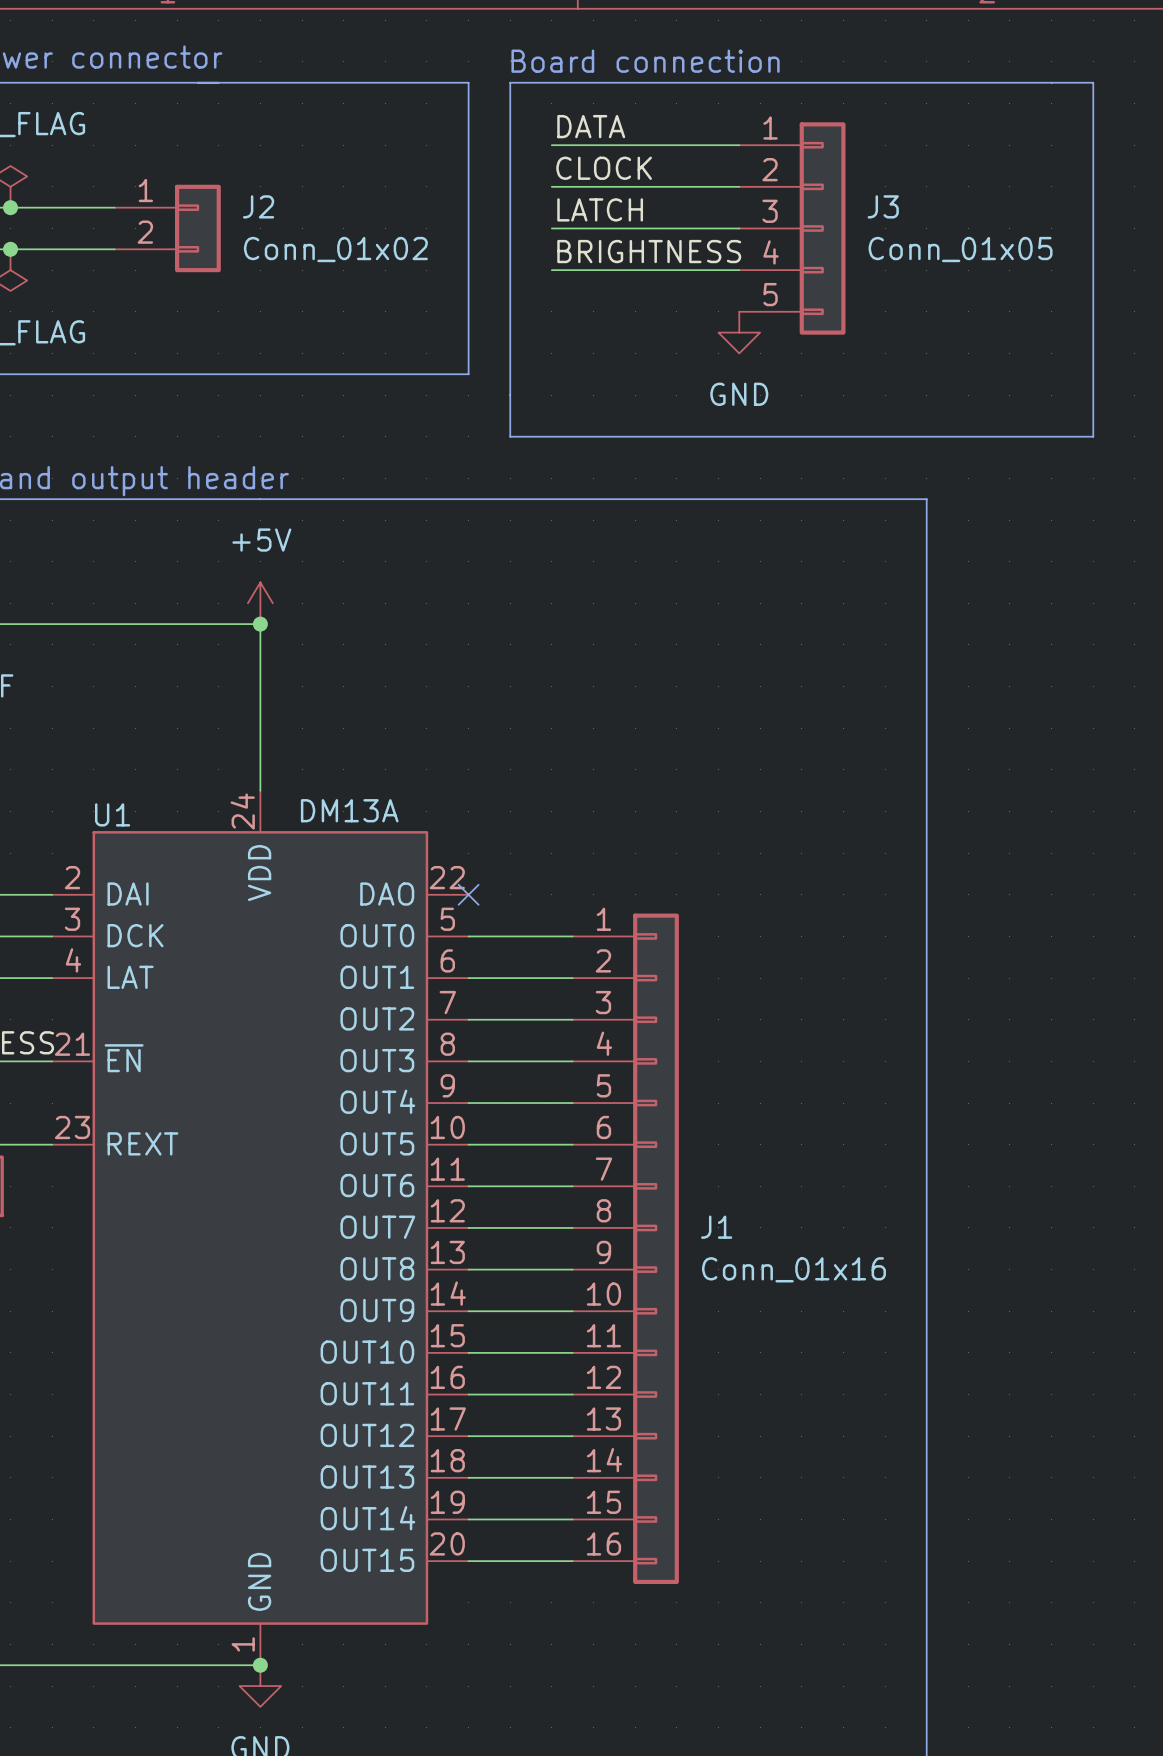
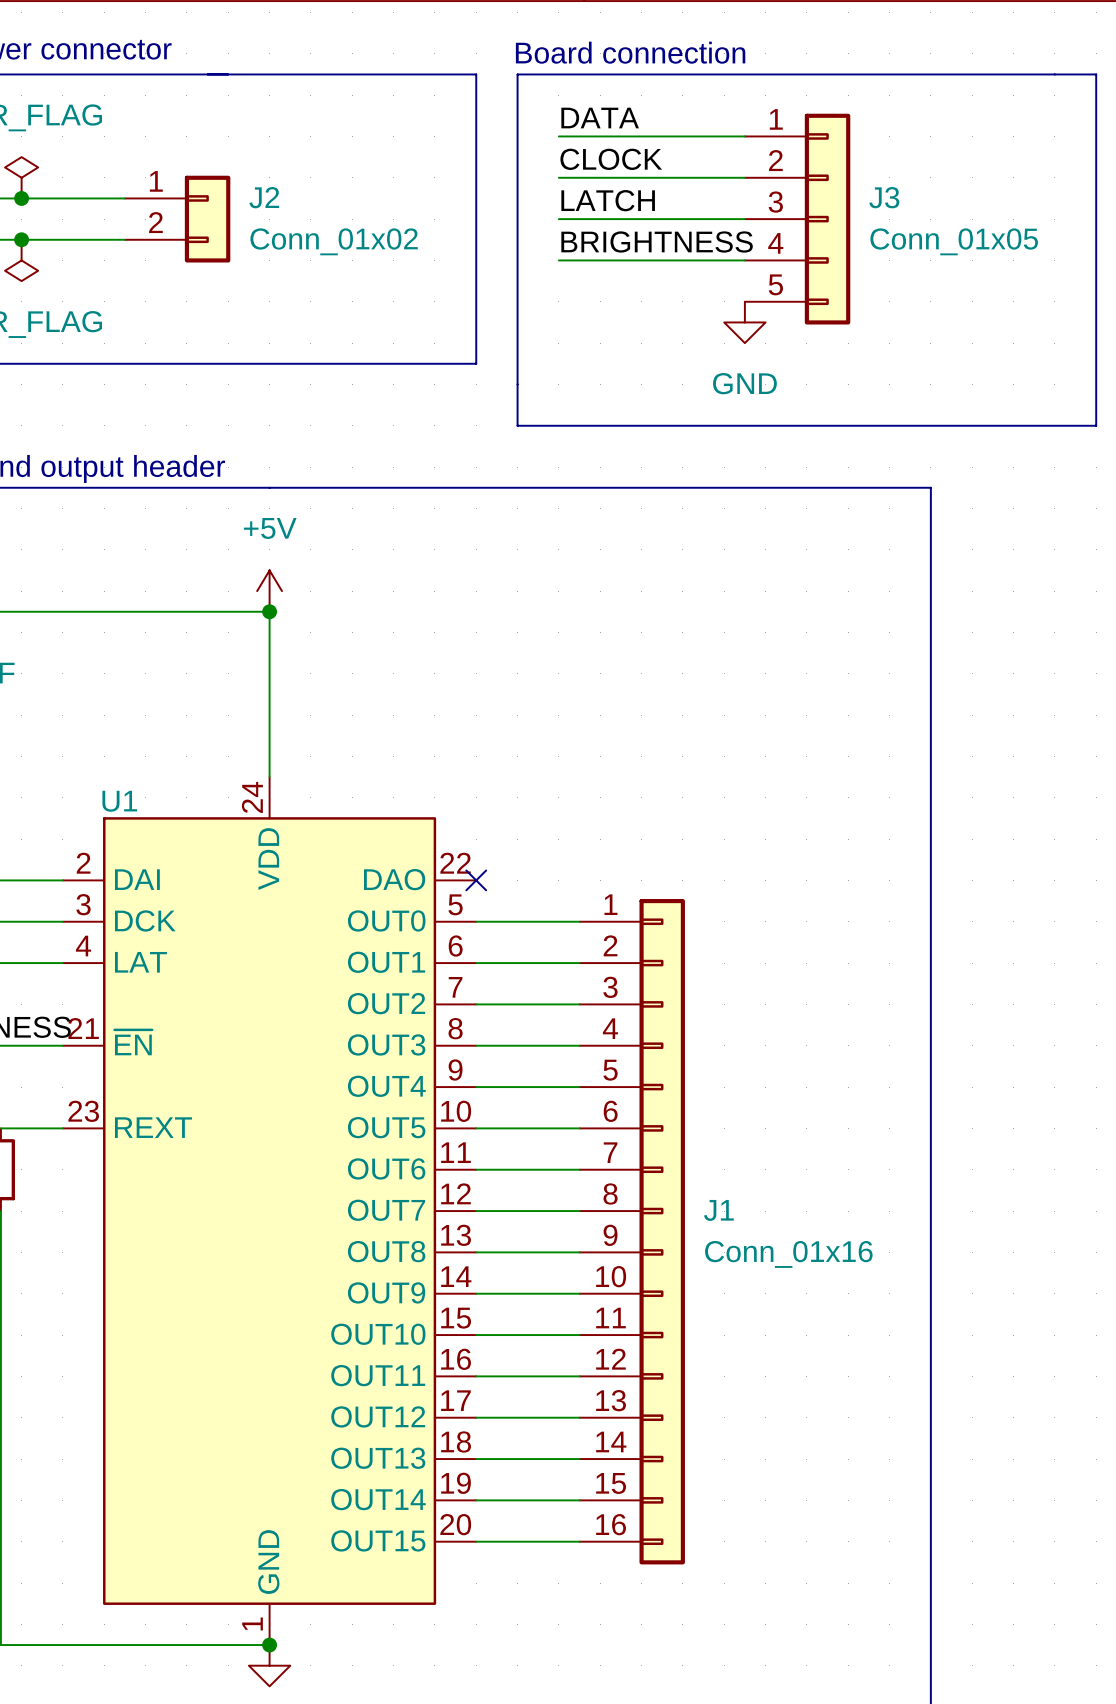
U1 value: DM13A (349, 810) -> none

